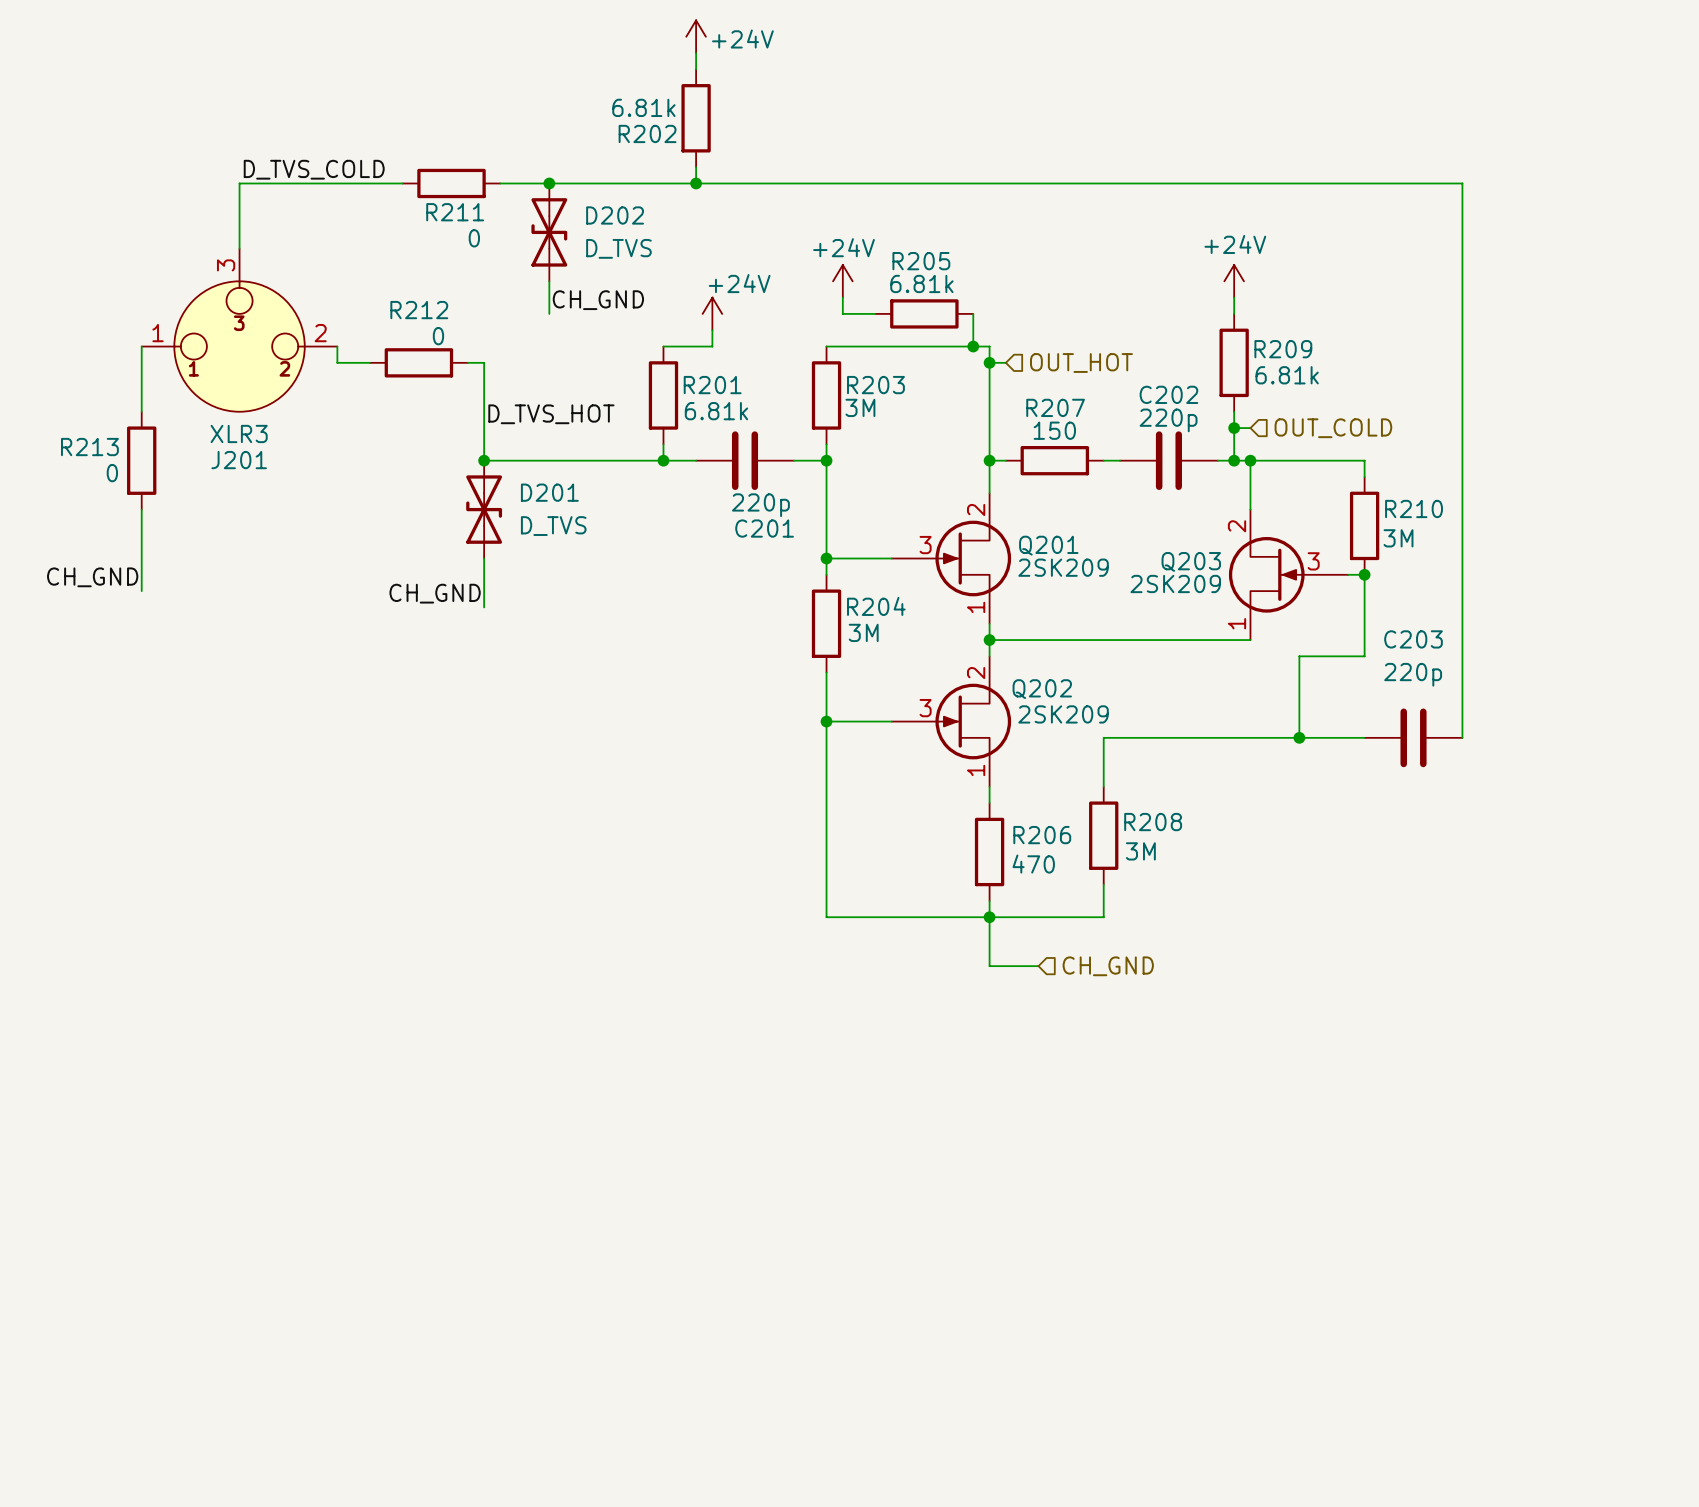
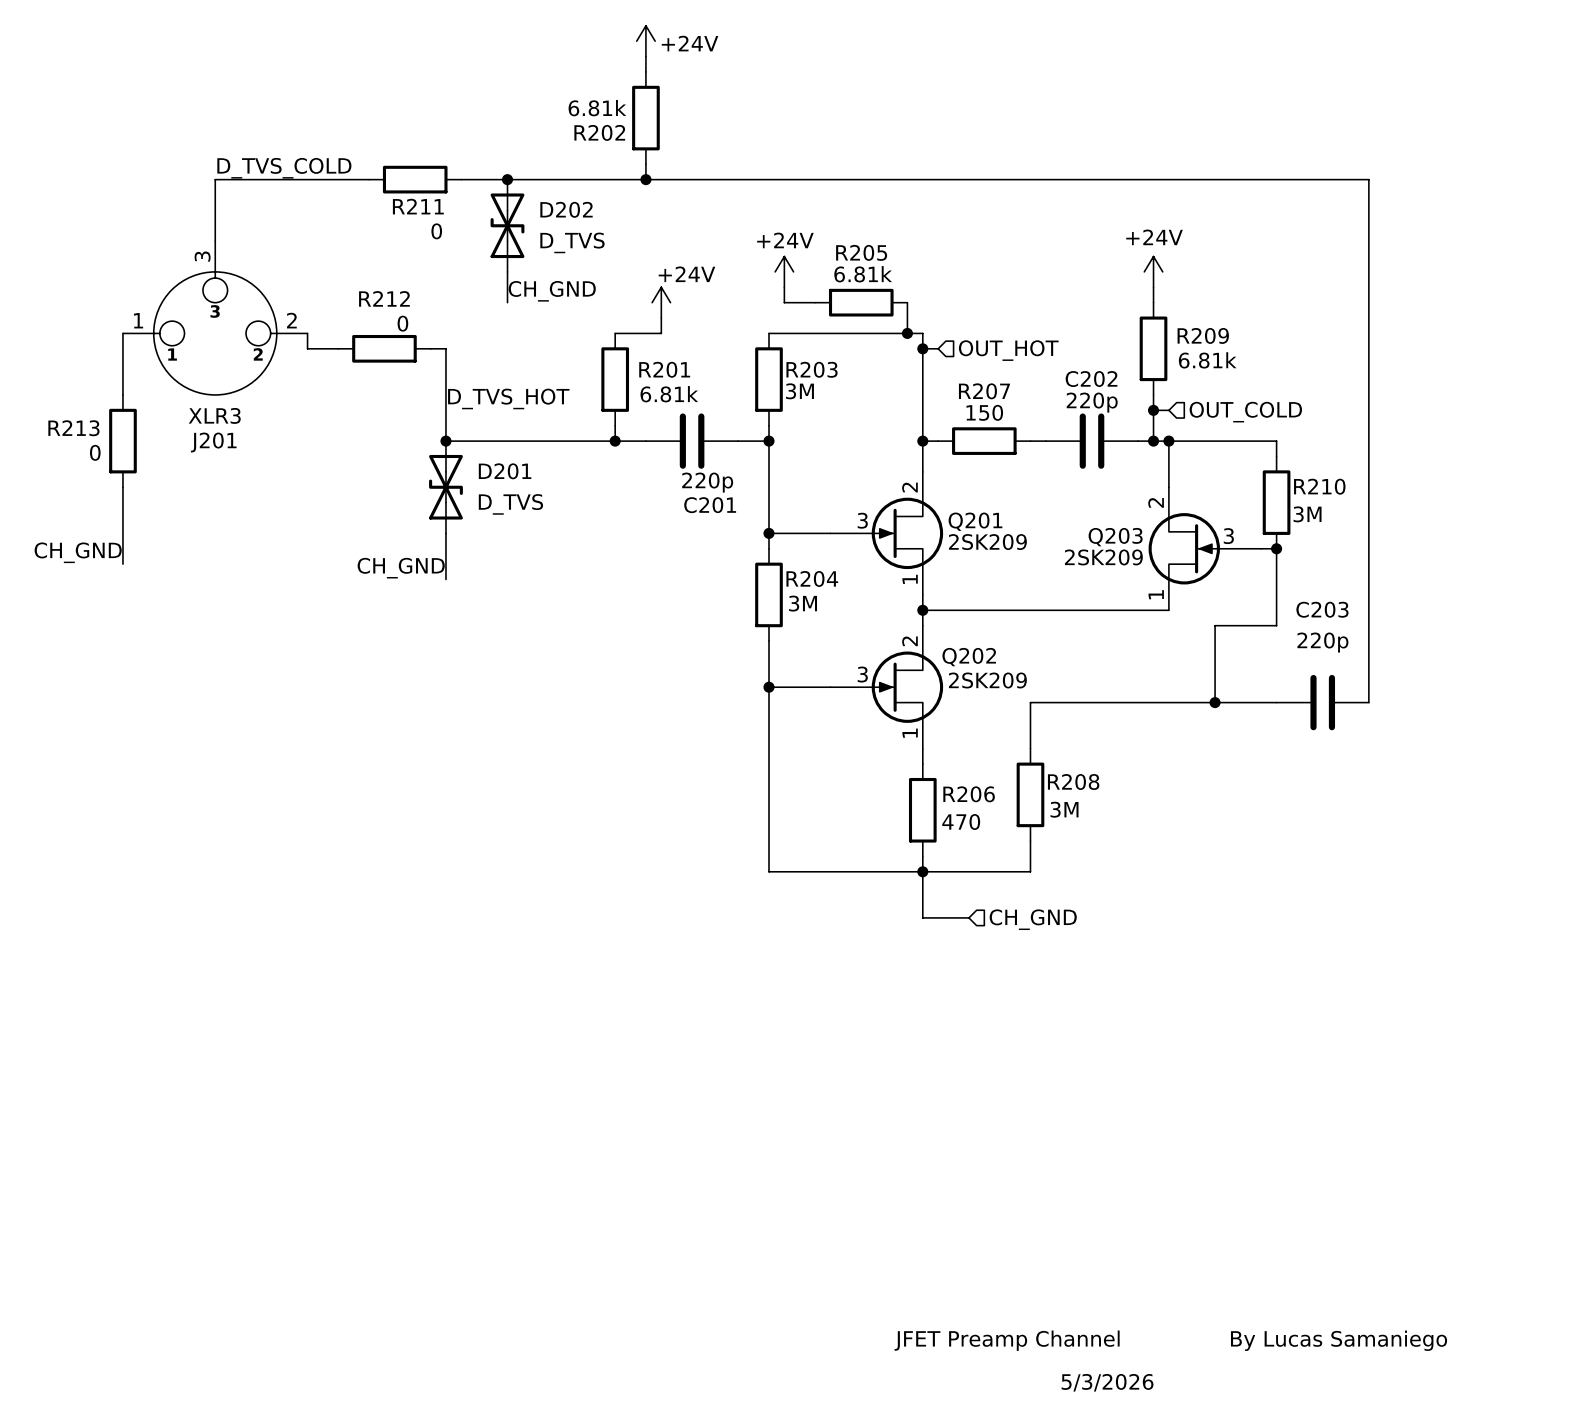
text: none -> JFET Preamp Channel By Lucas Samaniego (1170, 1340)
text: none -> 5/3/2026 (1107, 1382)

